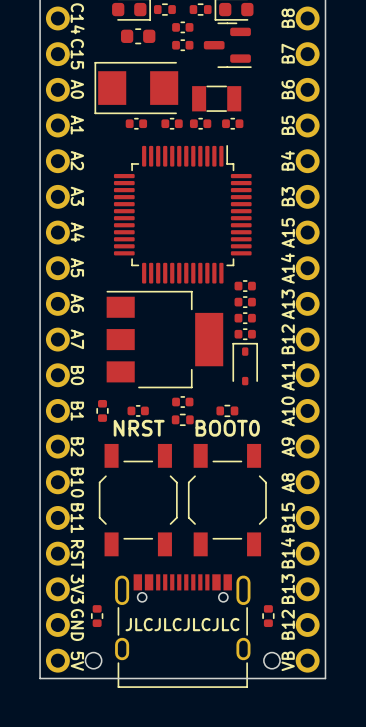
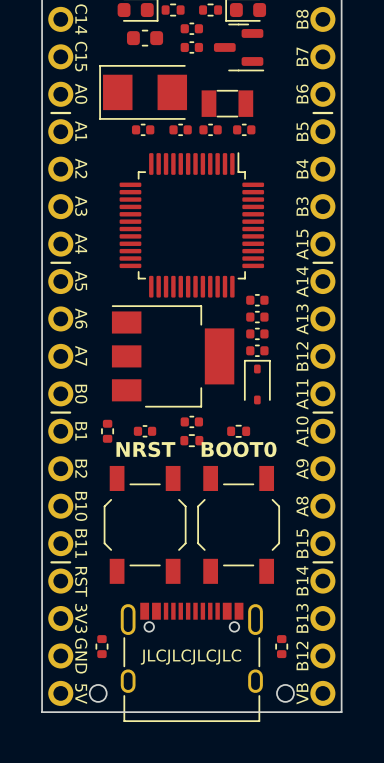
line: none -> (51, 113) (70, 113)
line: none -> (313, 113) (332, 113)
line: none -> (51, 262) (70, 262)
line: none -> (313, 262) (332, 262)
line: none -> (51, 412) (70, 412)
line: none -> (313, 412) (332, 412)
line: none -> (51, 562) (70, 562)
line: none -> (313, 562) (332, 562)

